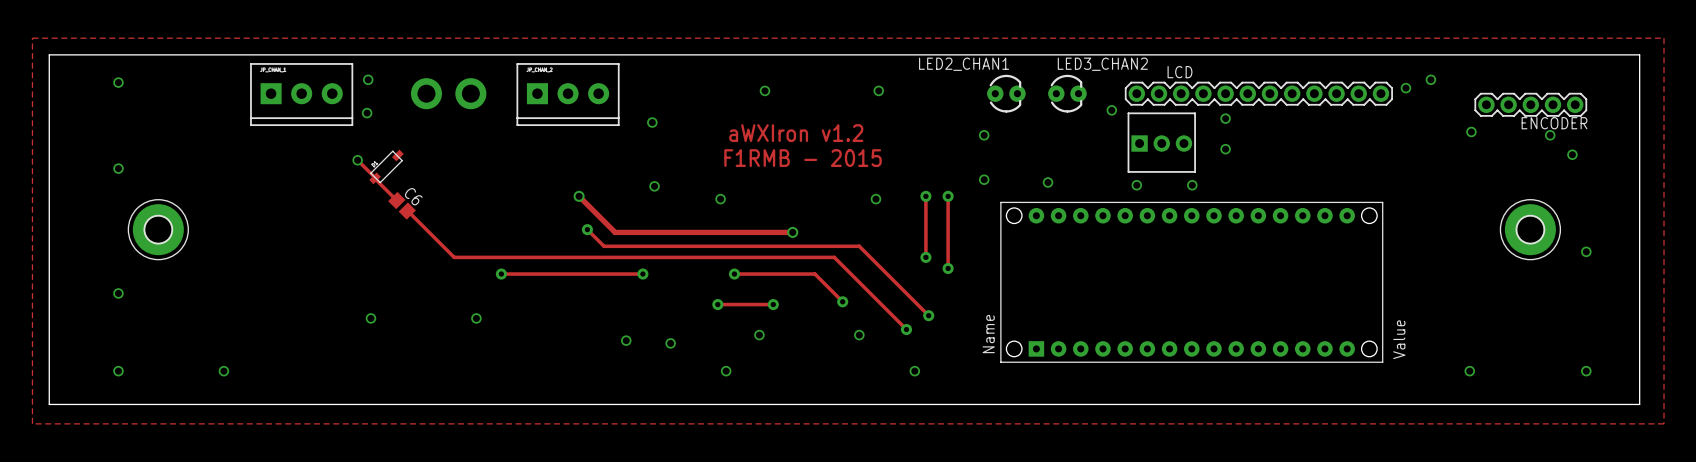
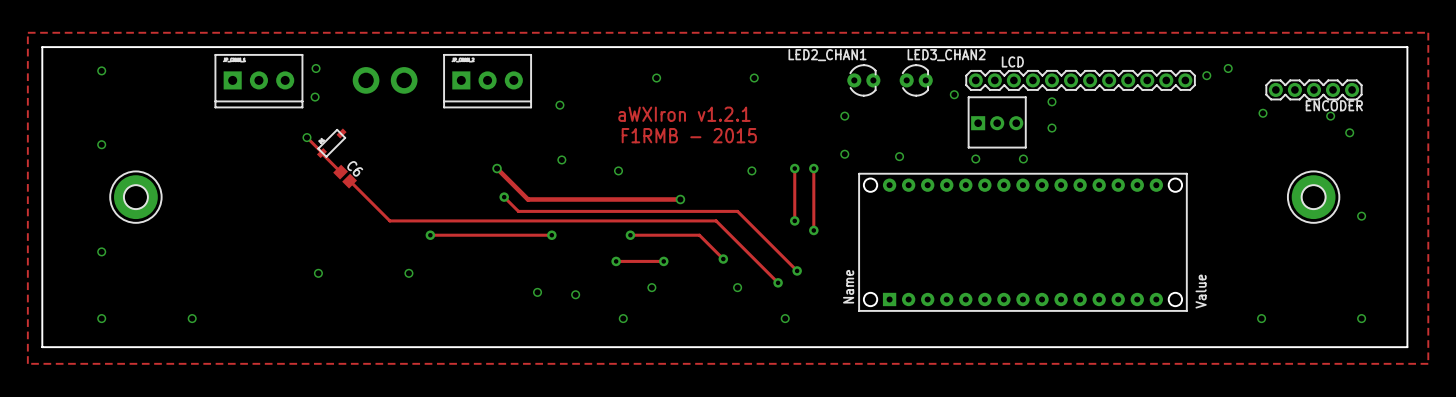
text: aWXIron v1.2 (796, 133) -> aWXIron v1.2.1 (684, 114)

